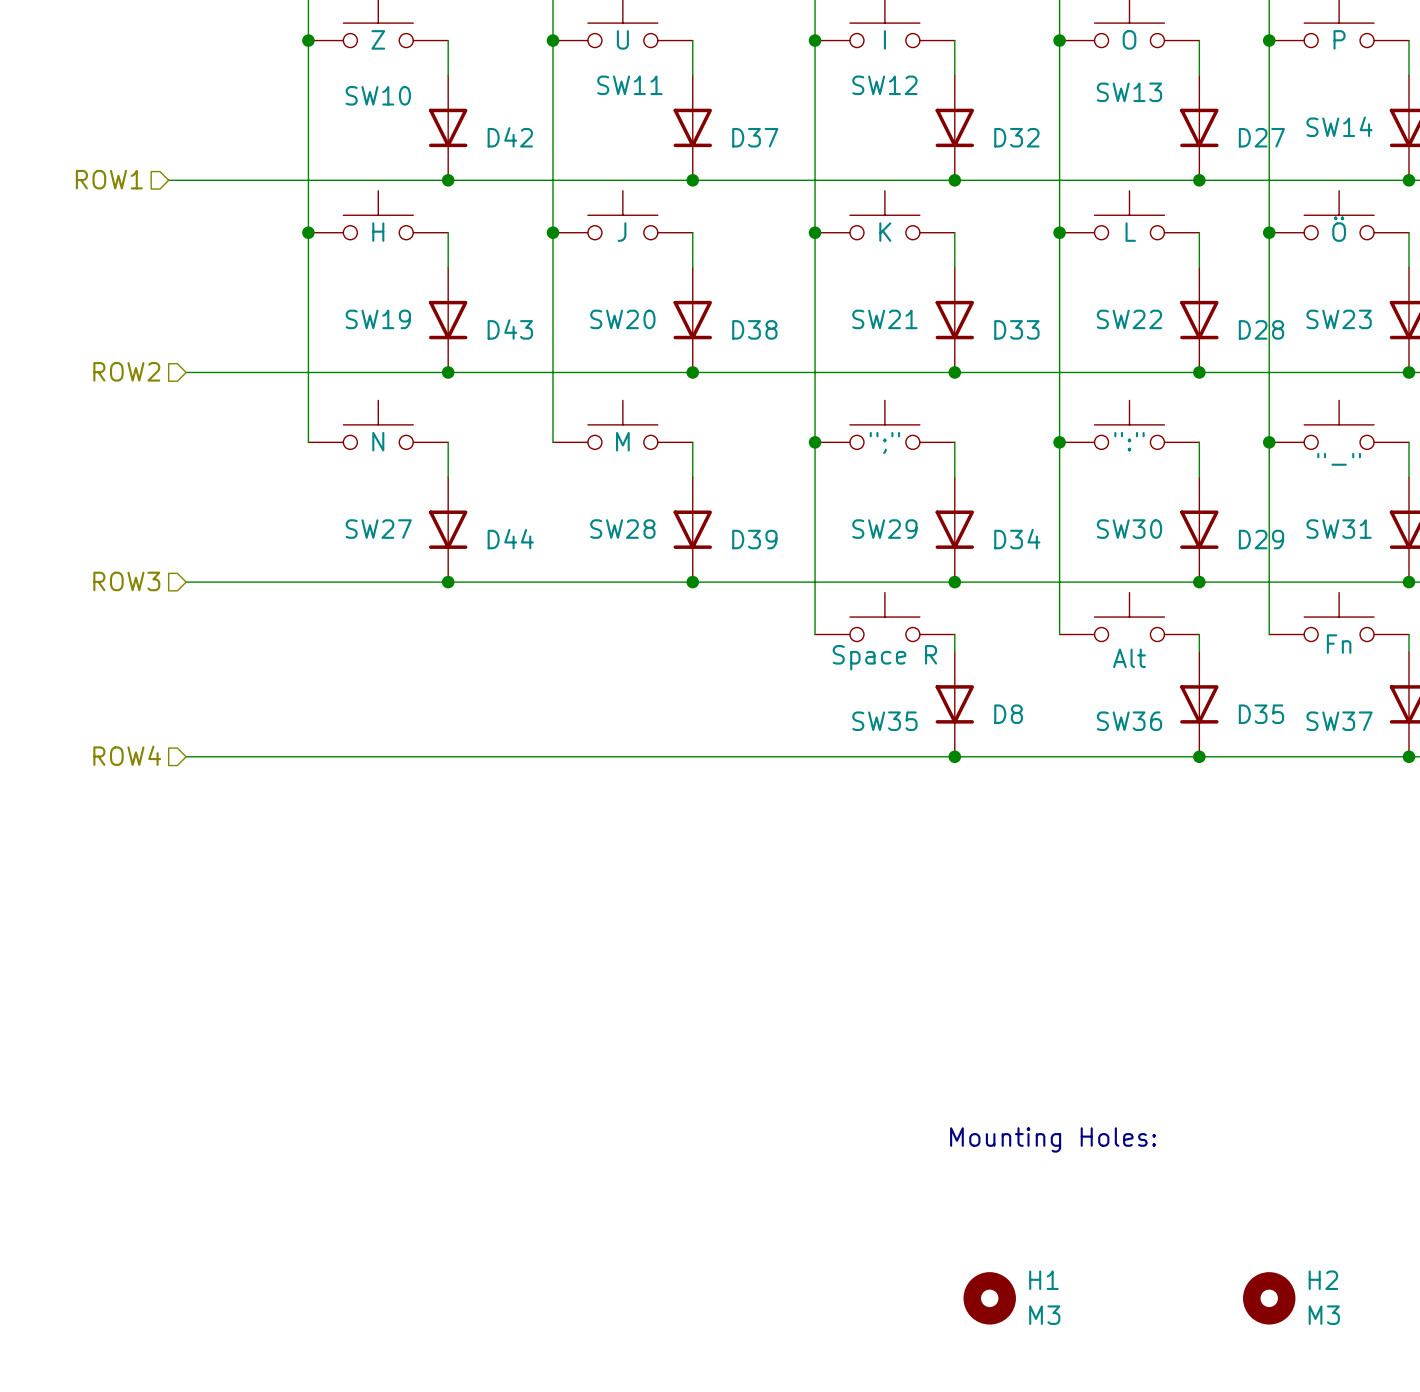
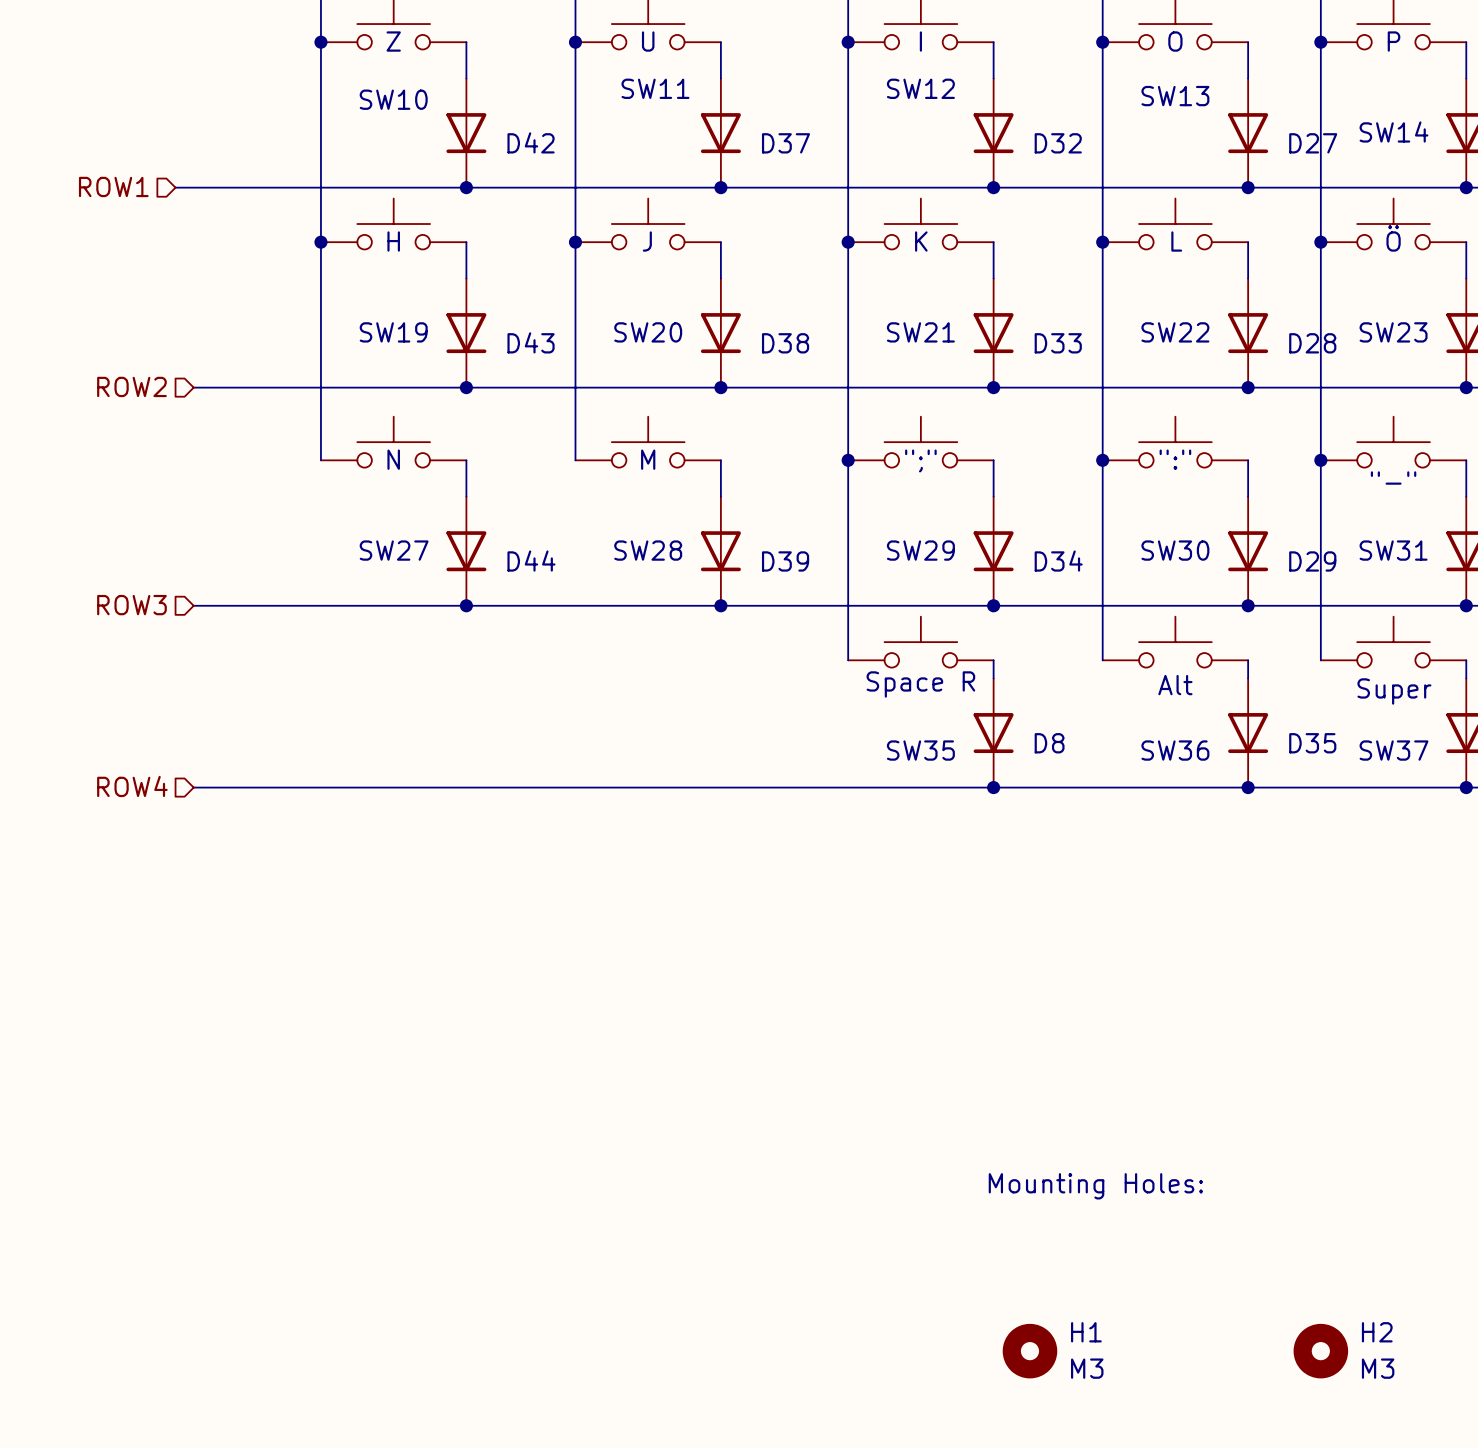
SW37 text: Fn (1339, 644) -> Super (1394, 691)

